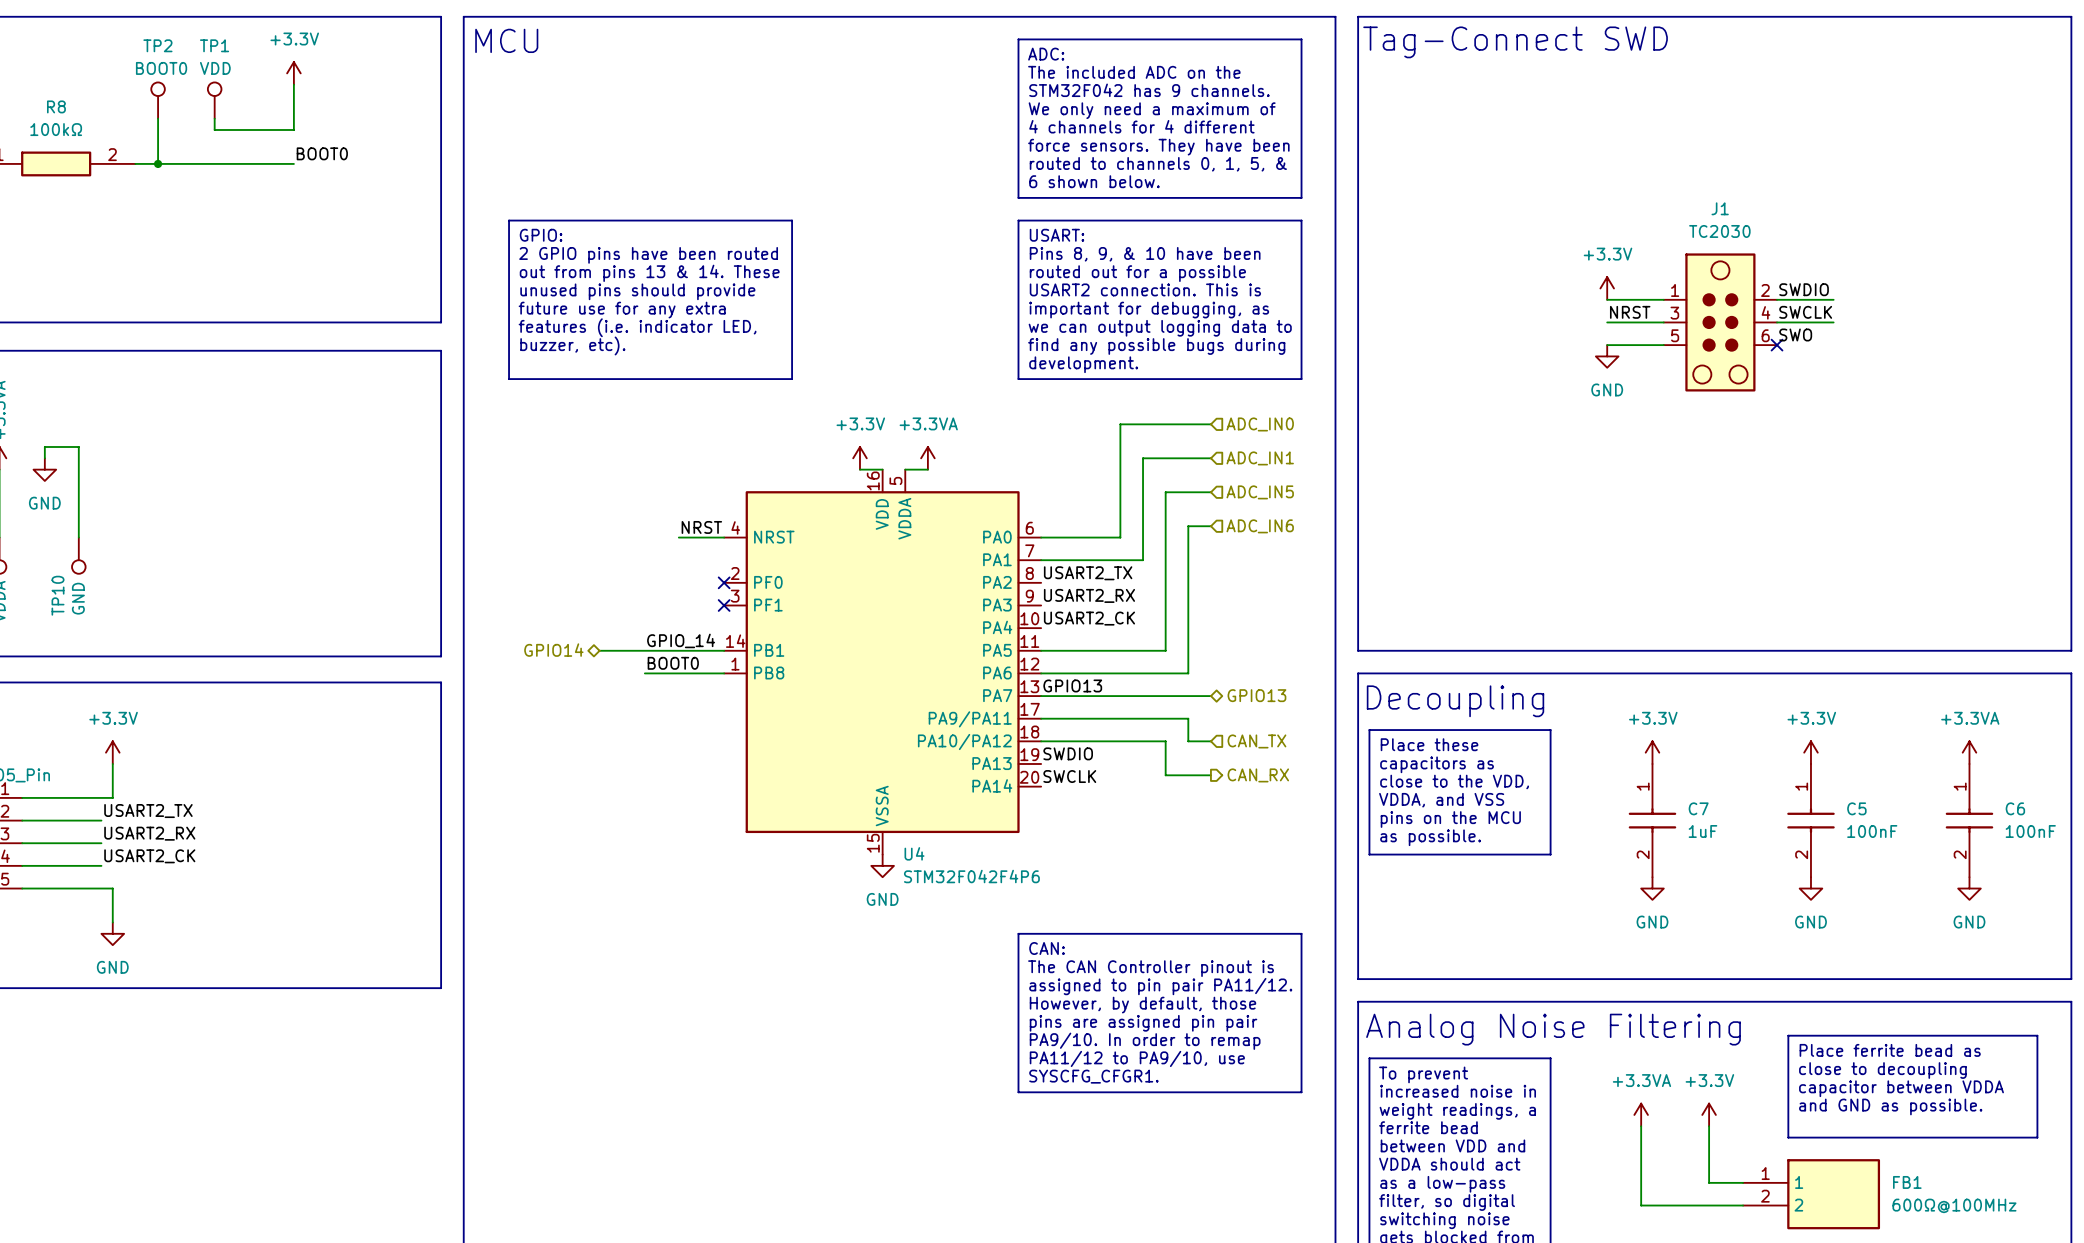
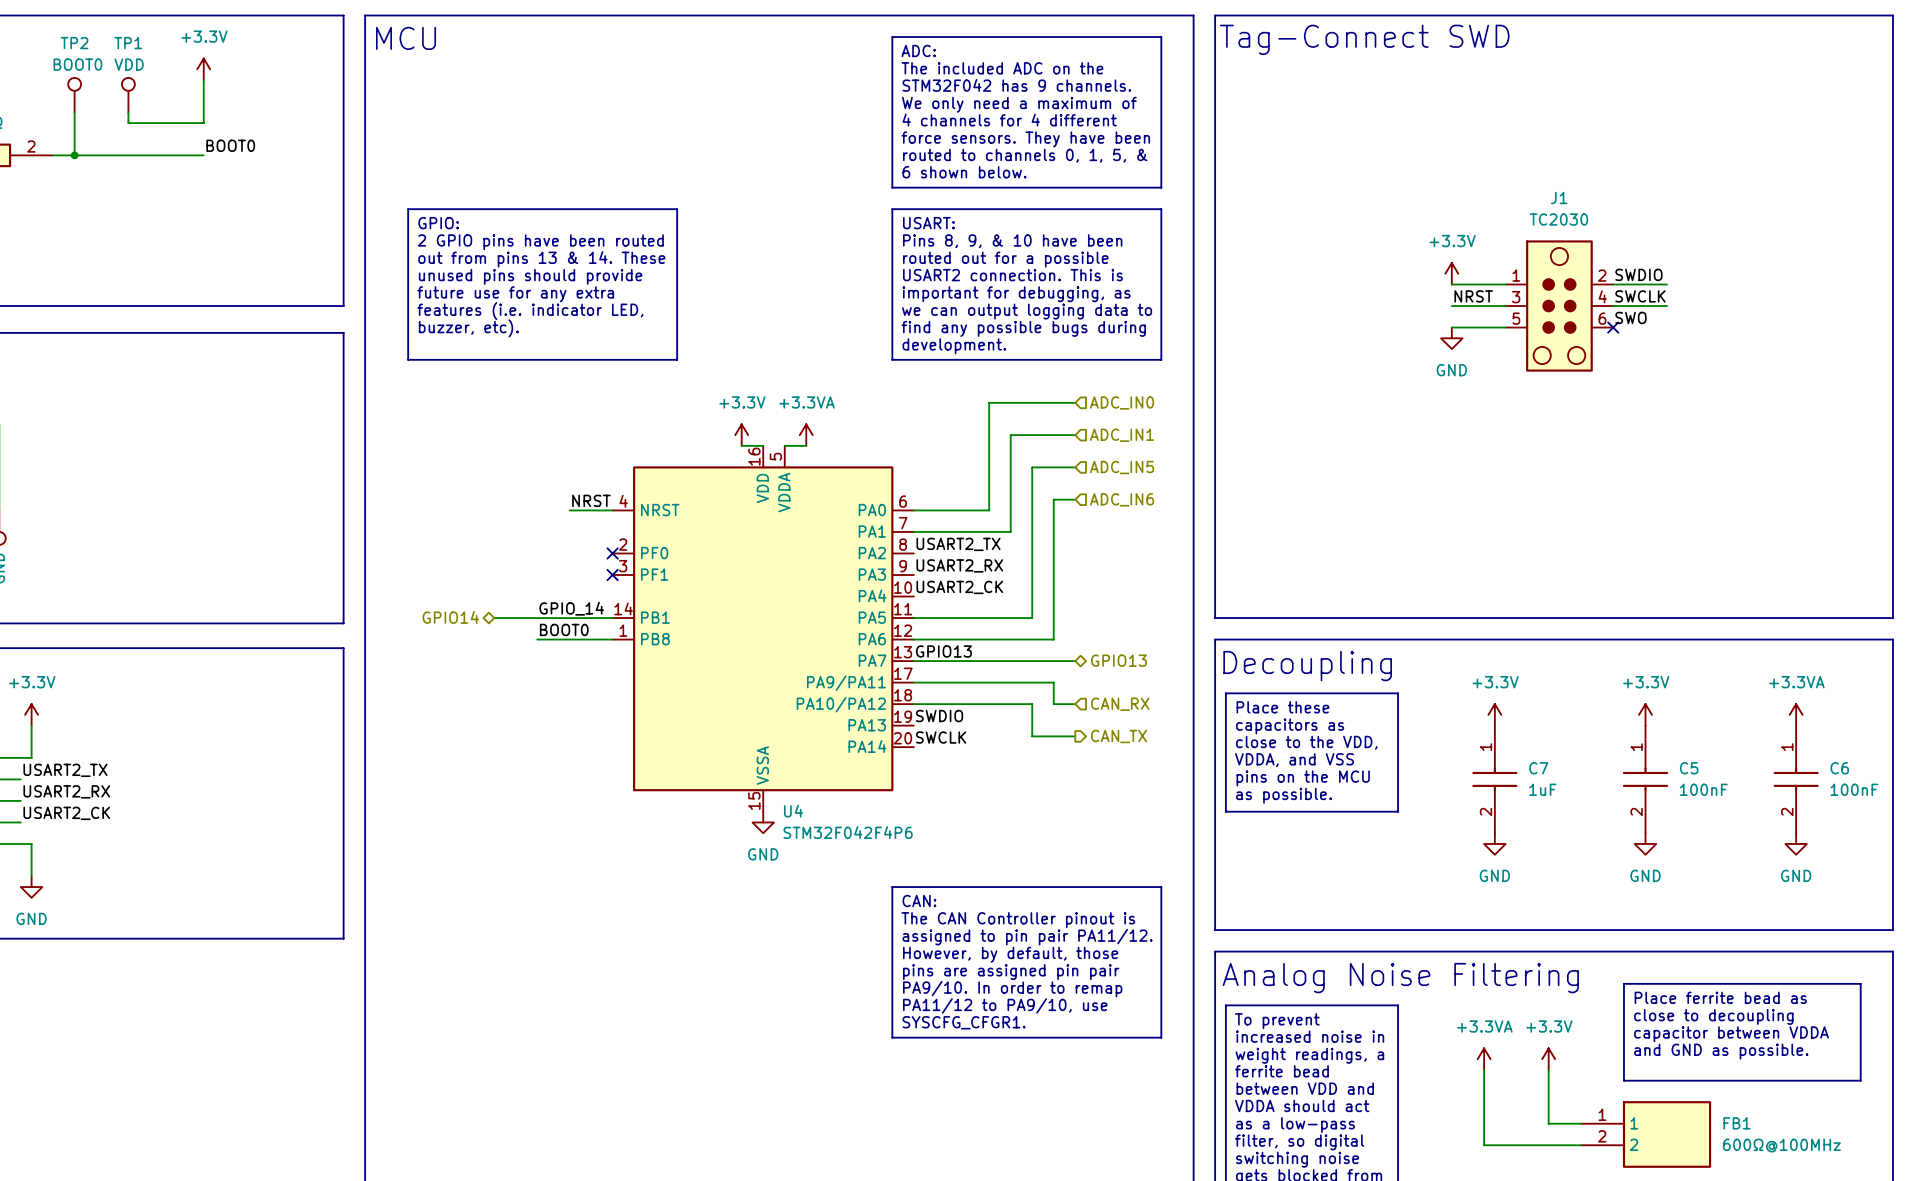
hierarchical label: CAN_TX (1256, 741) -> CAN_RX (1120, 704)
hierarchical label: CAN_RX (1258, 775) -> CAN_TX (1118, 736)

